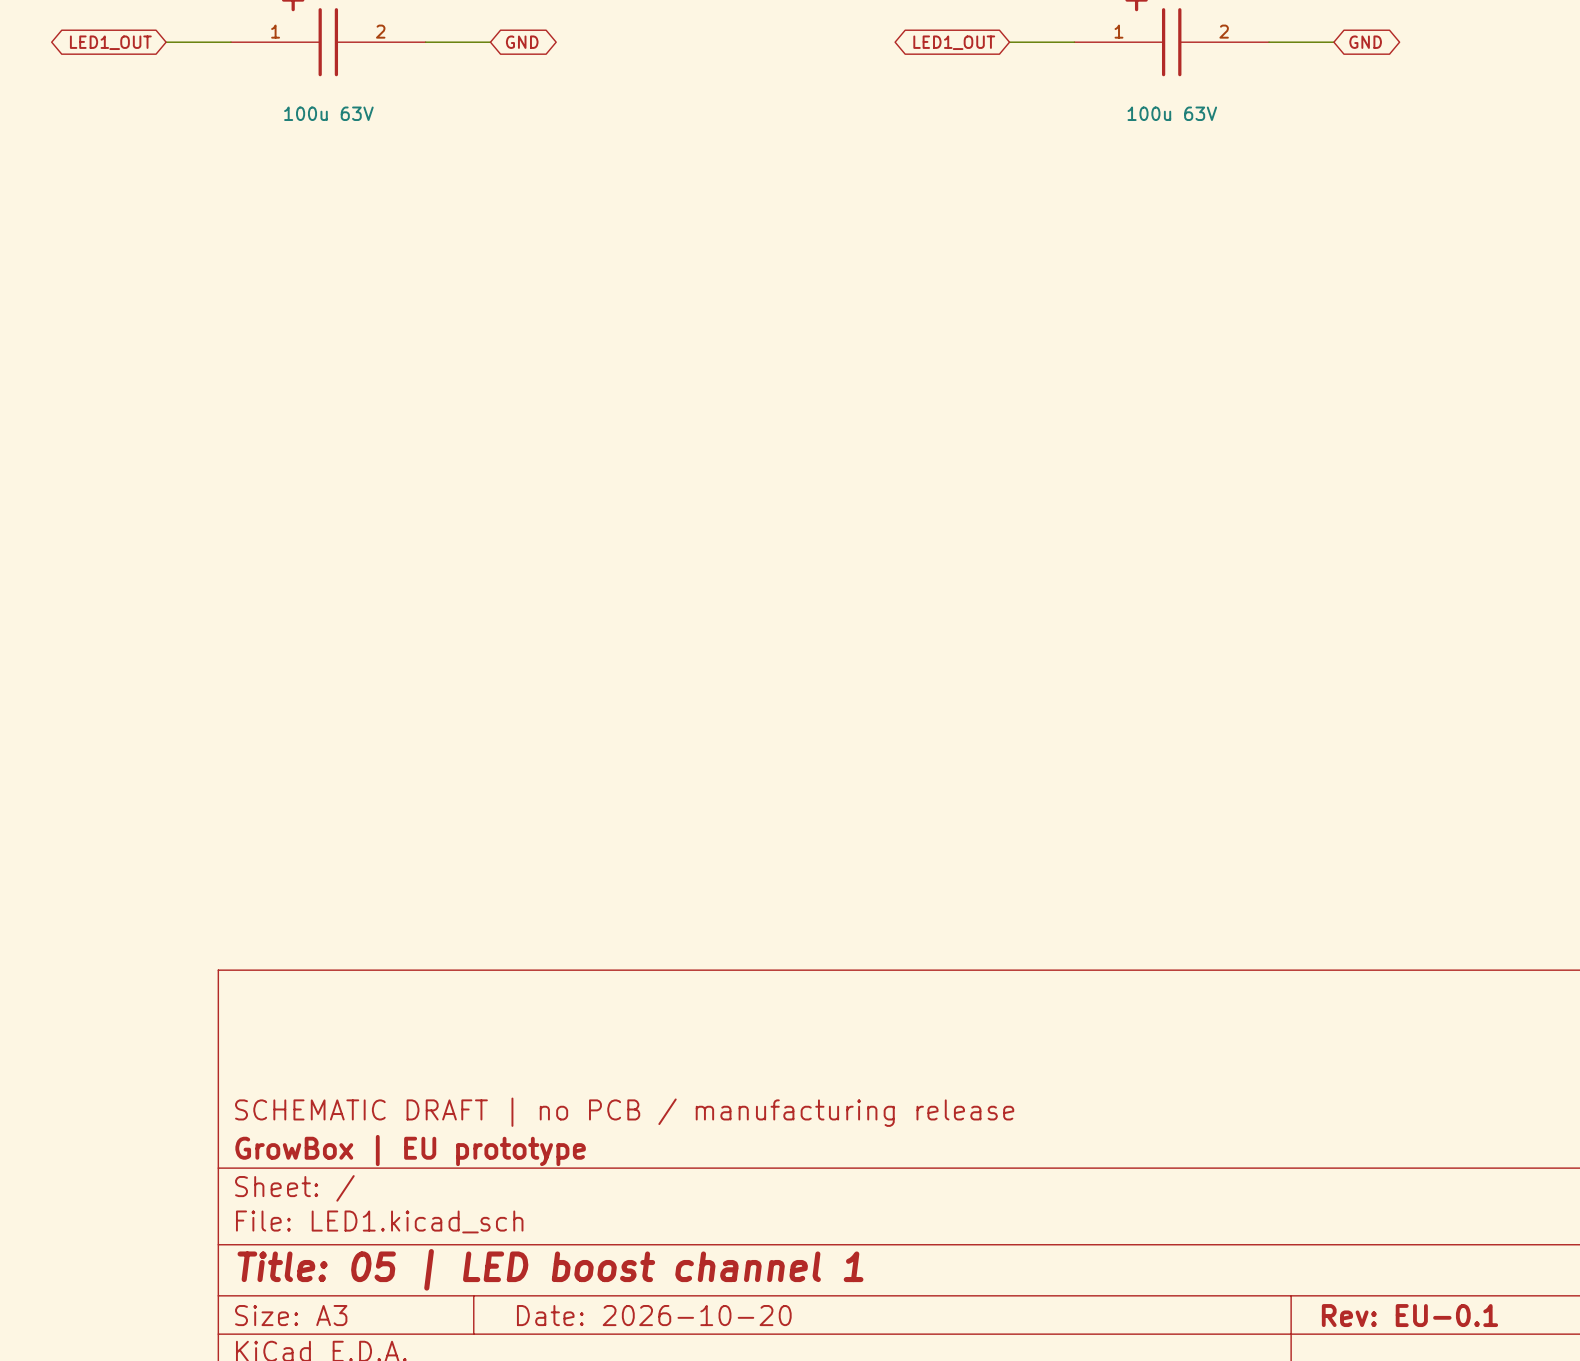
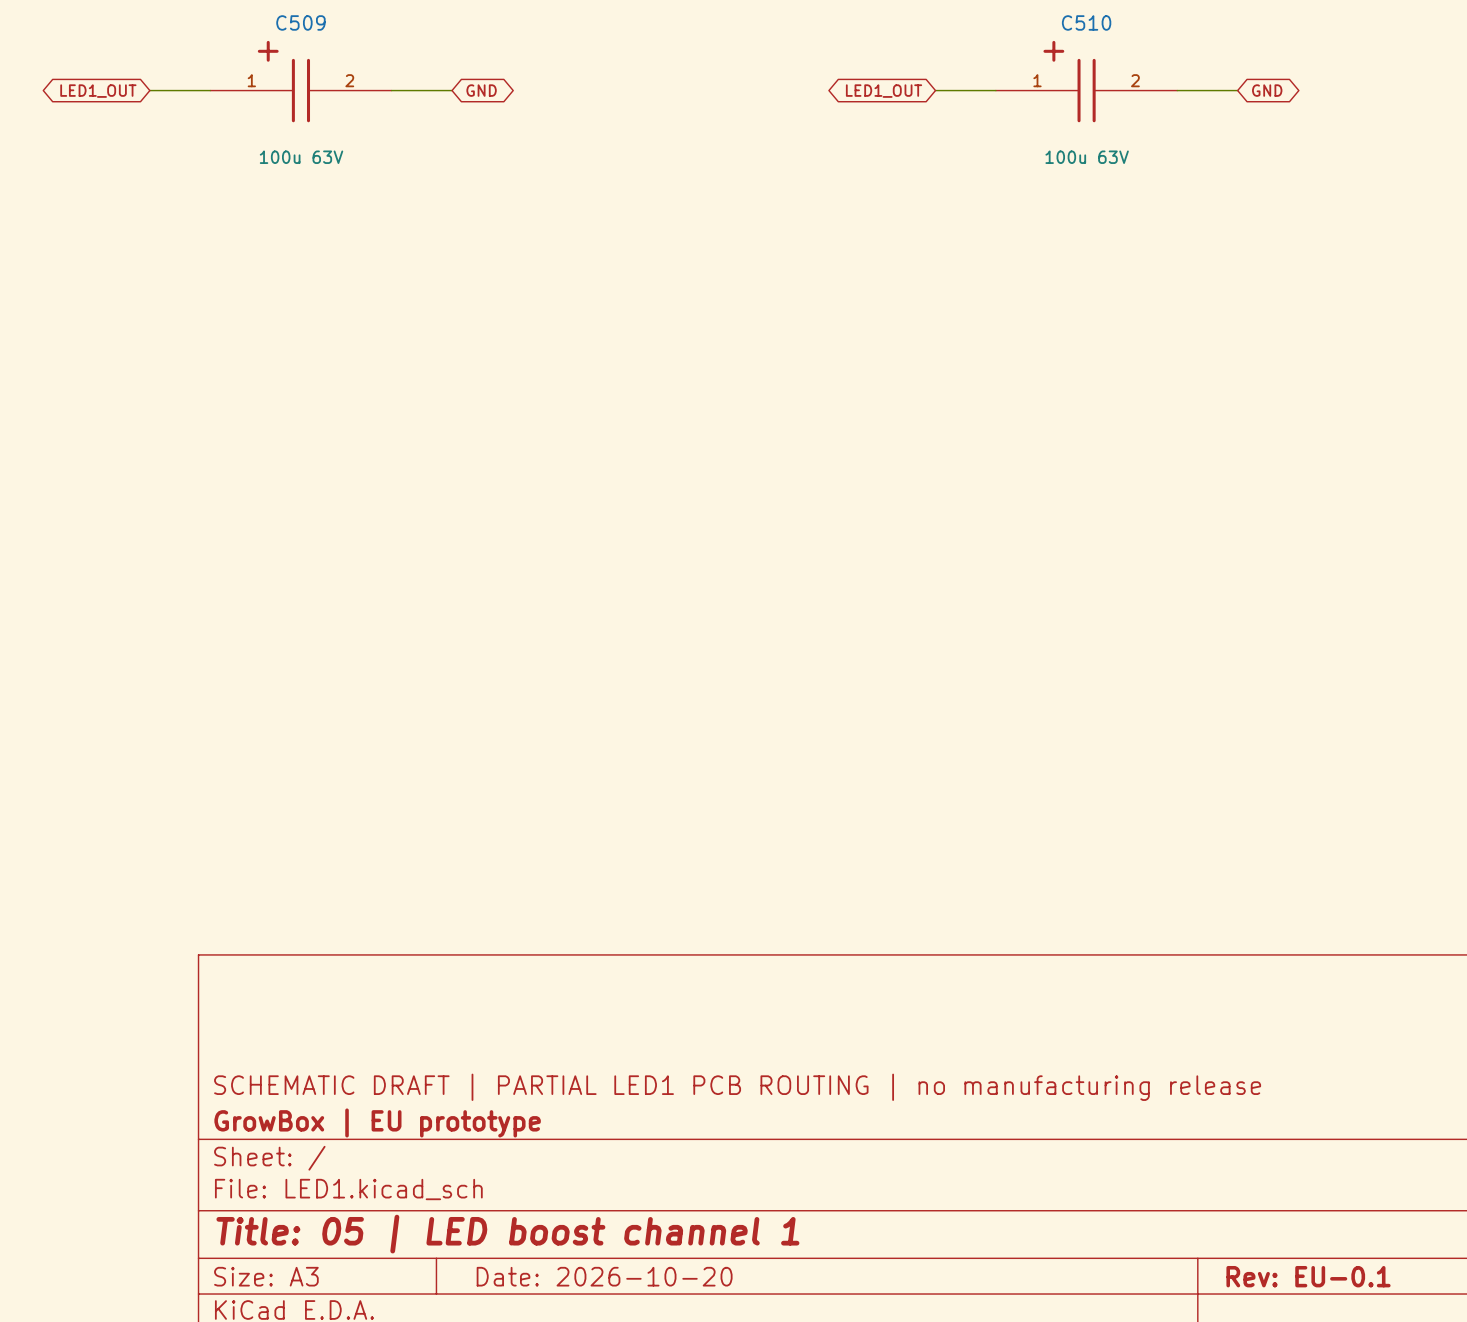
title block: SCHEMATIC DRAFT | no PCB / manufacturing release (624, 1112) -> SCHEMATIC DRAFT | PARTIAL LED1 PCB ROUTING | no manufacturing release (737, 1087)

